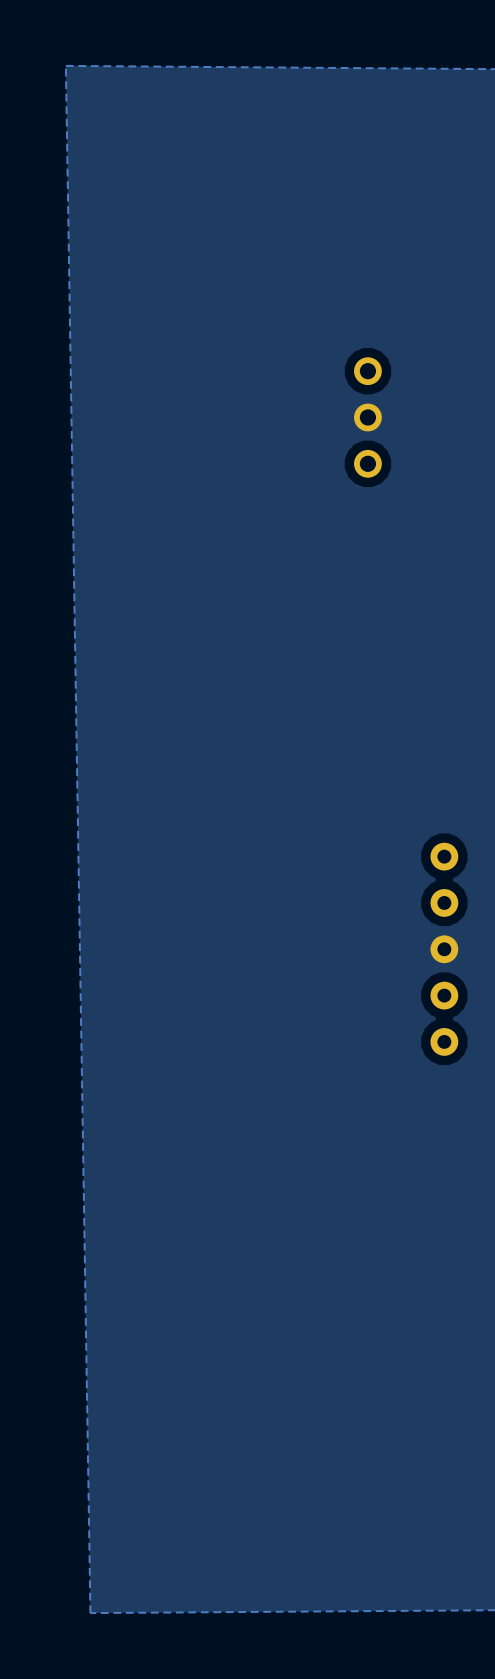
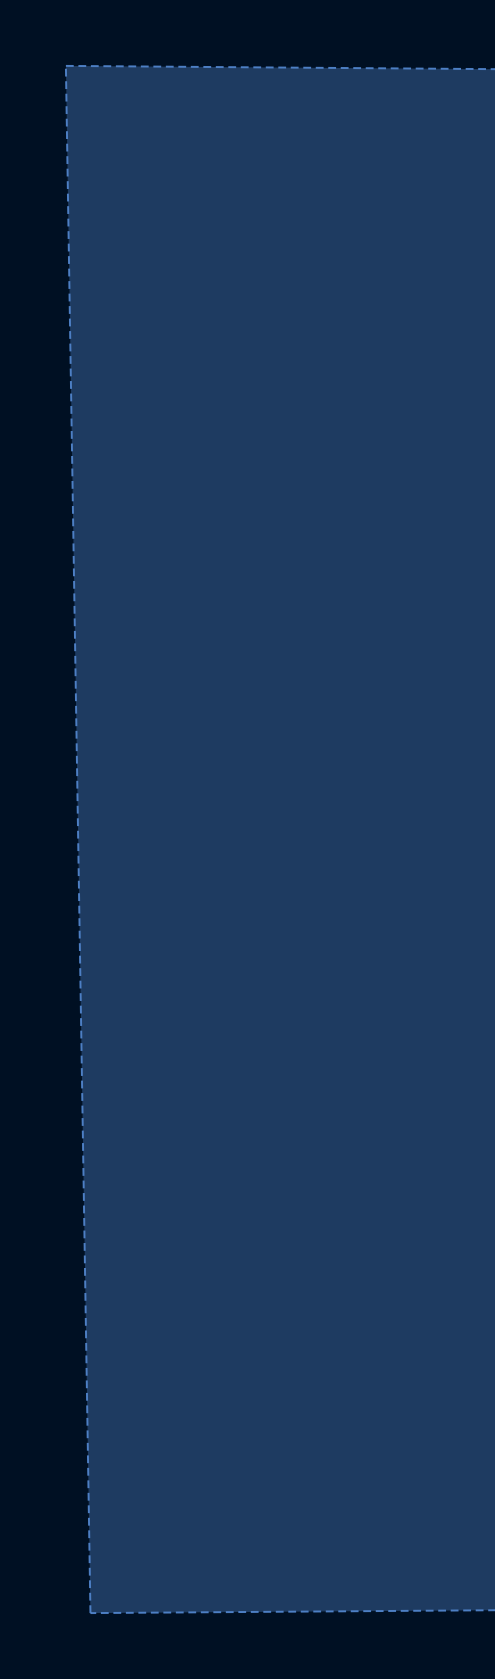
part: (367, 417) -> none
part: (444, 949) -> none

